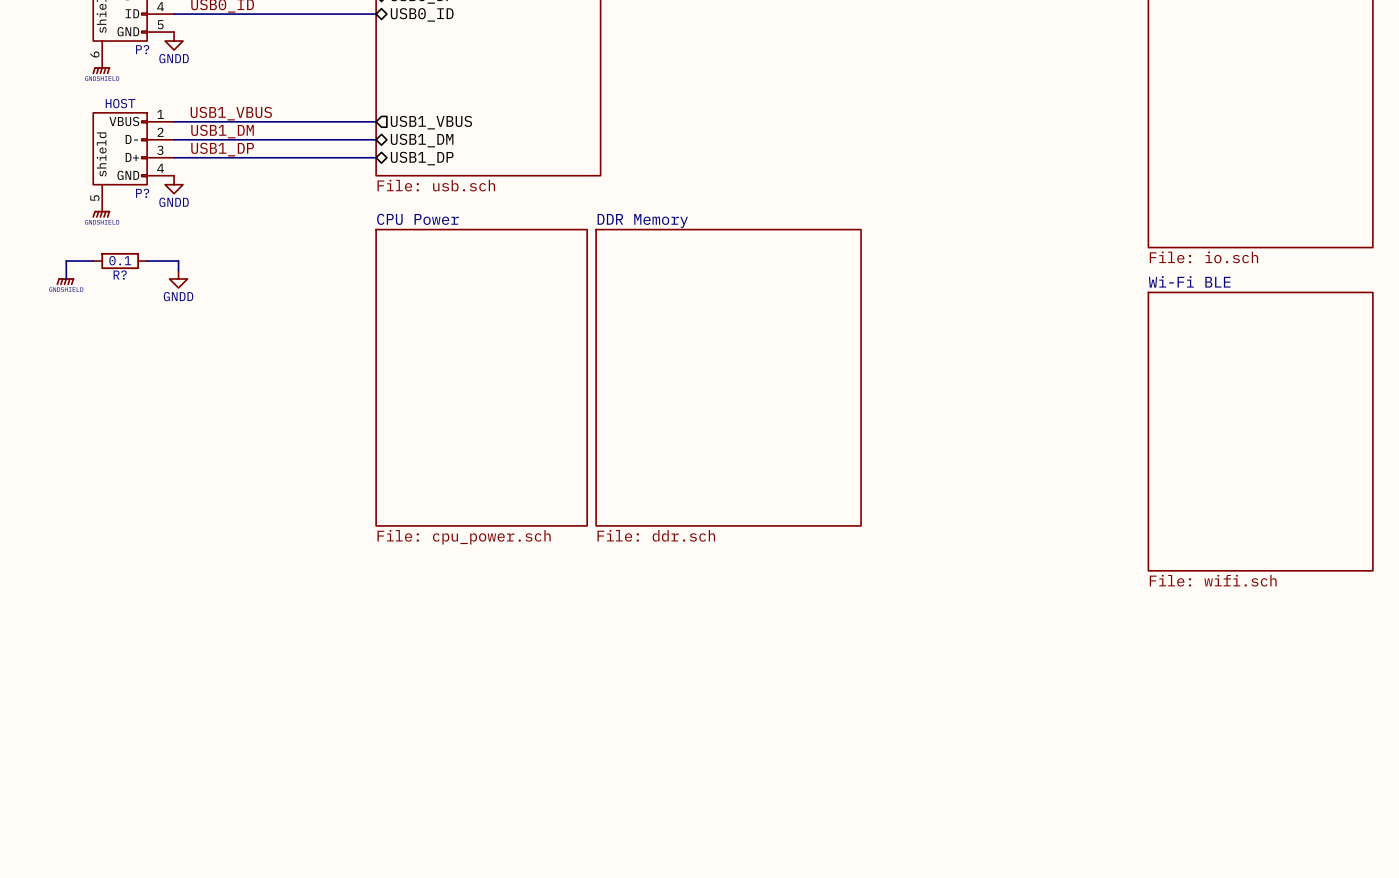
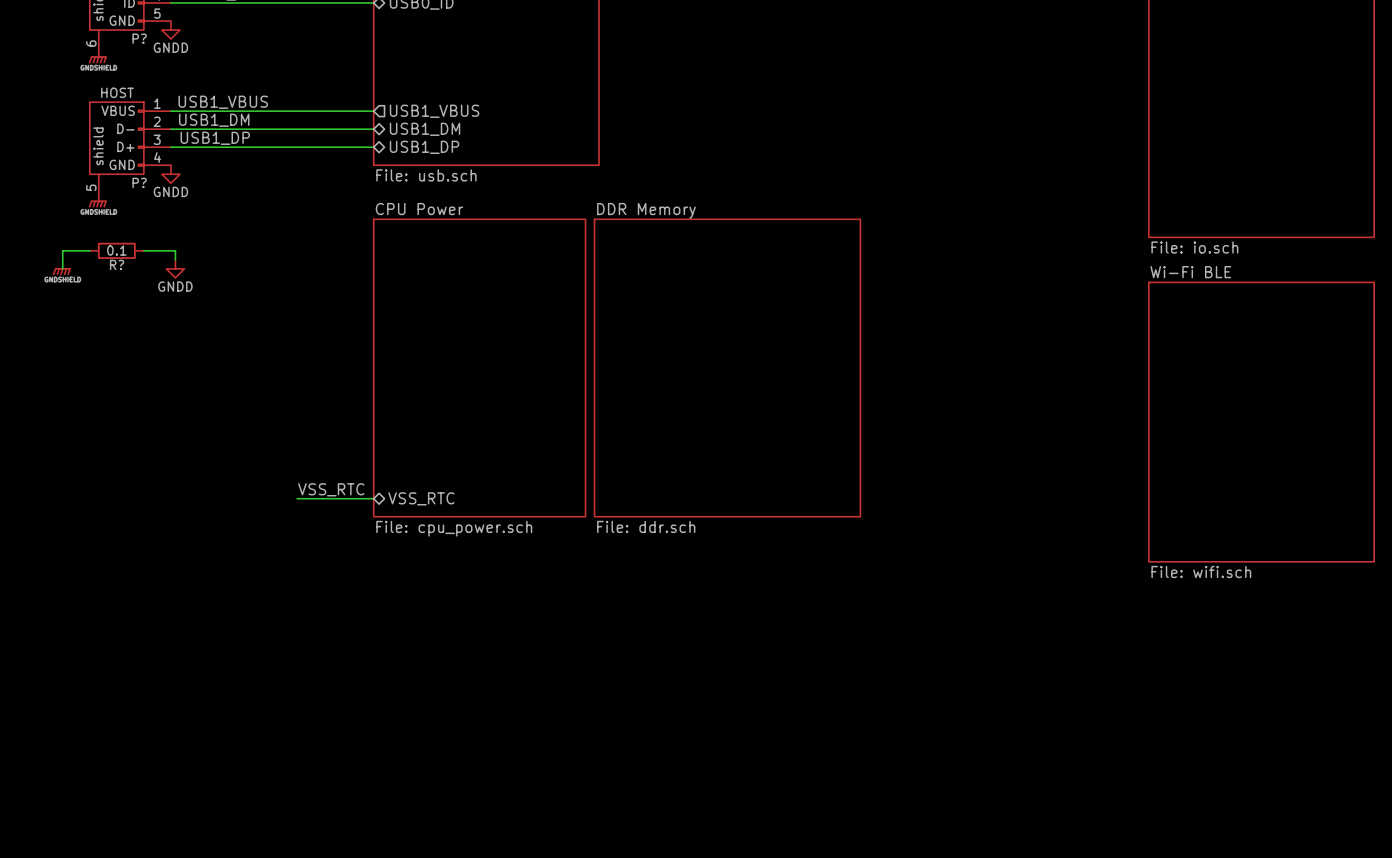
label: none -> VSS_RTC (331, 489)
wire: none -> (297, 498) (373, 498)
sheet pin: none -> VSS_RTC (421, 498)

